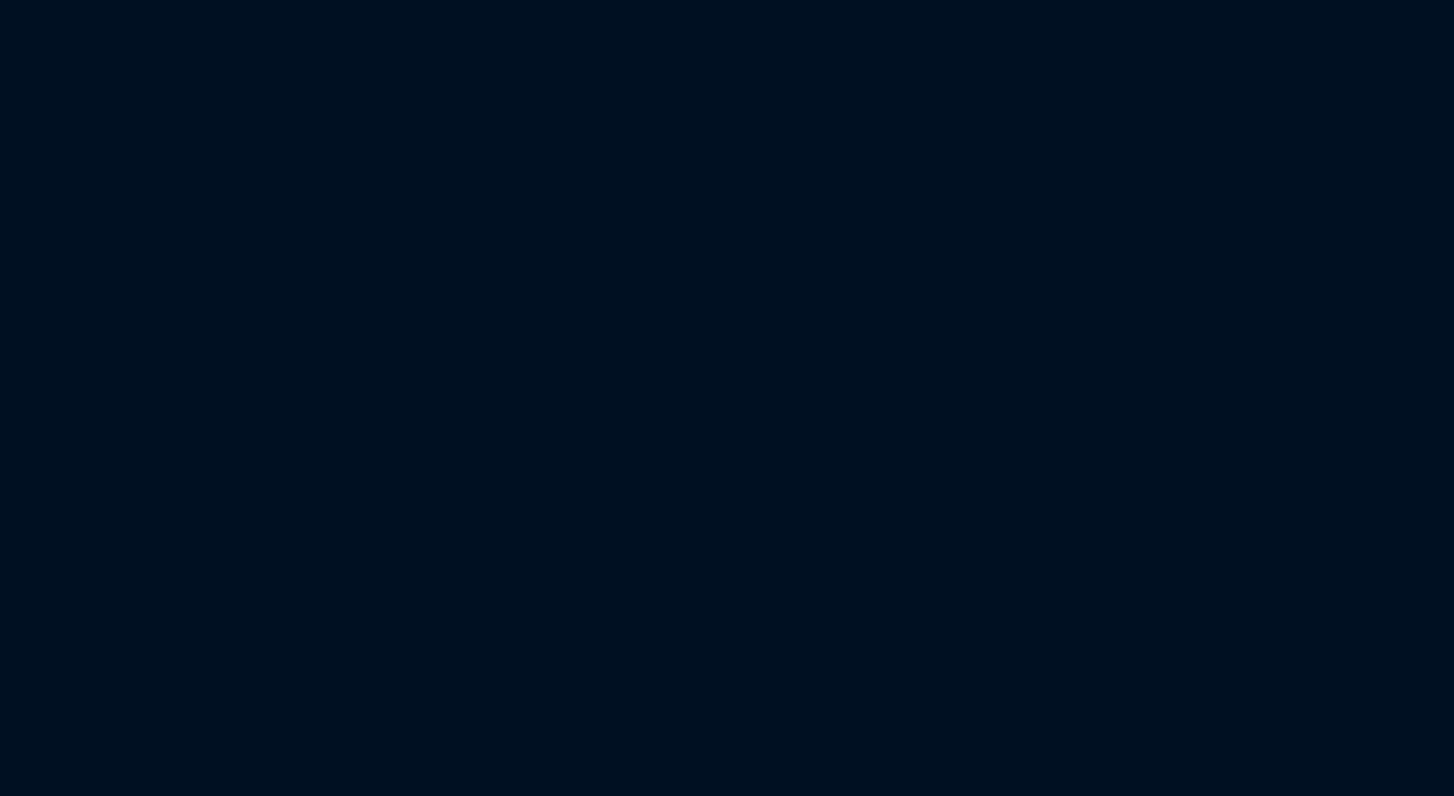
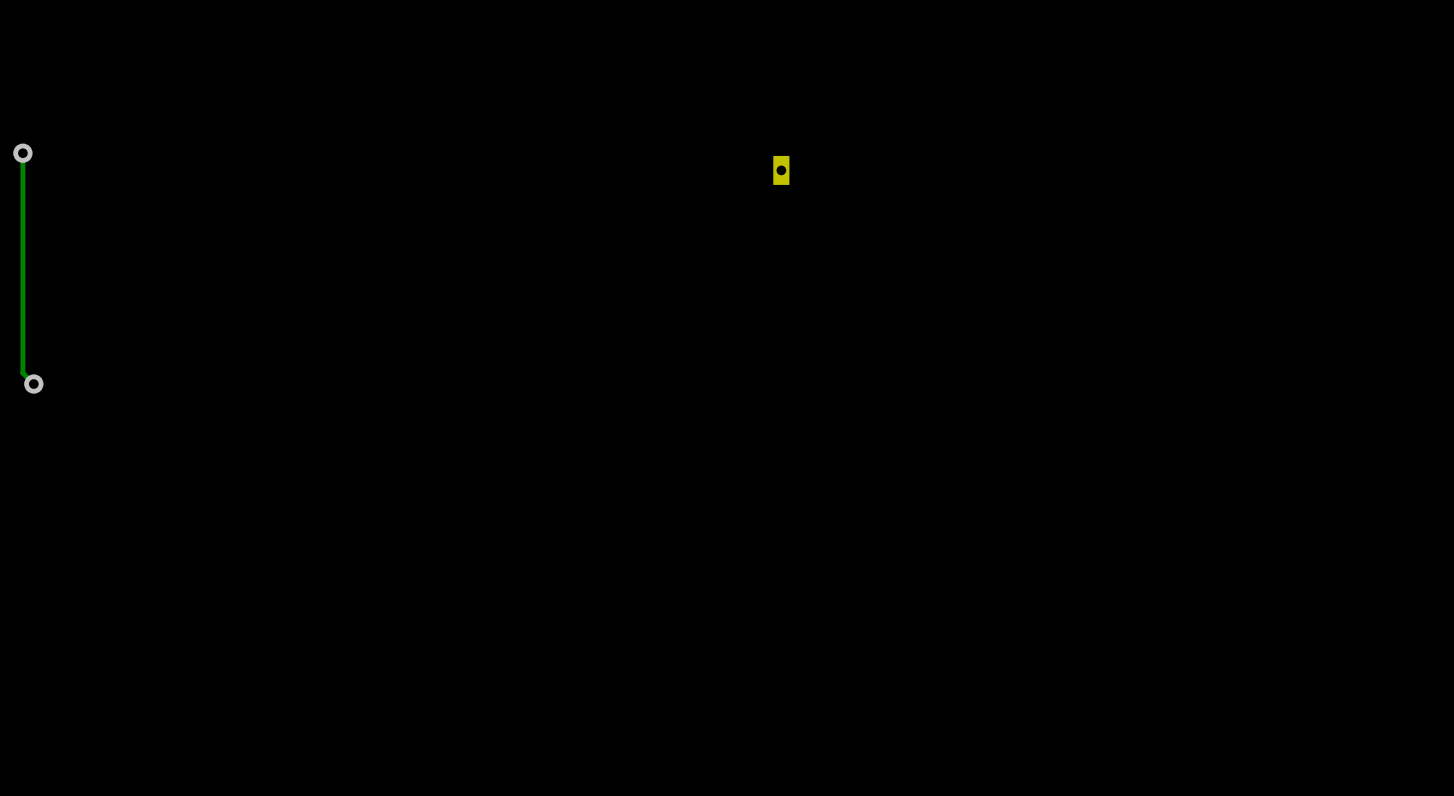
track: none -> (22, 153) (22, 373) (33, 384)
via: none -> (22, 153)
part: none -> (781, 170)
via: none -> (33, 384)

